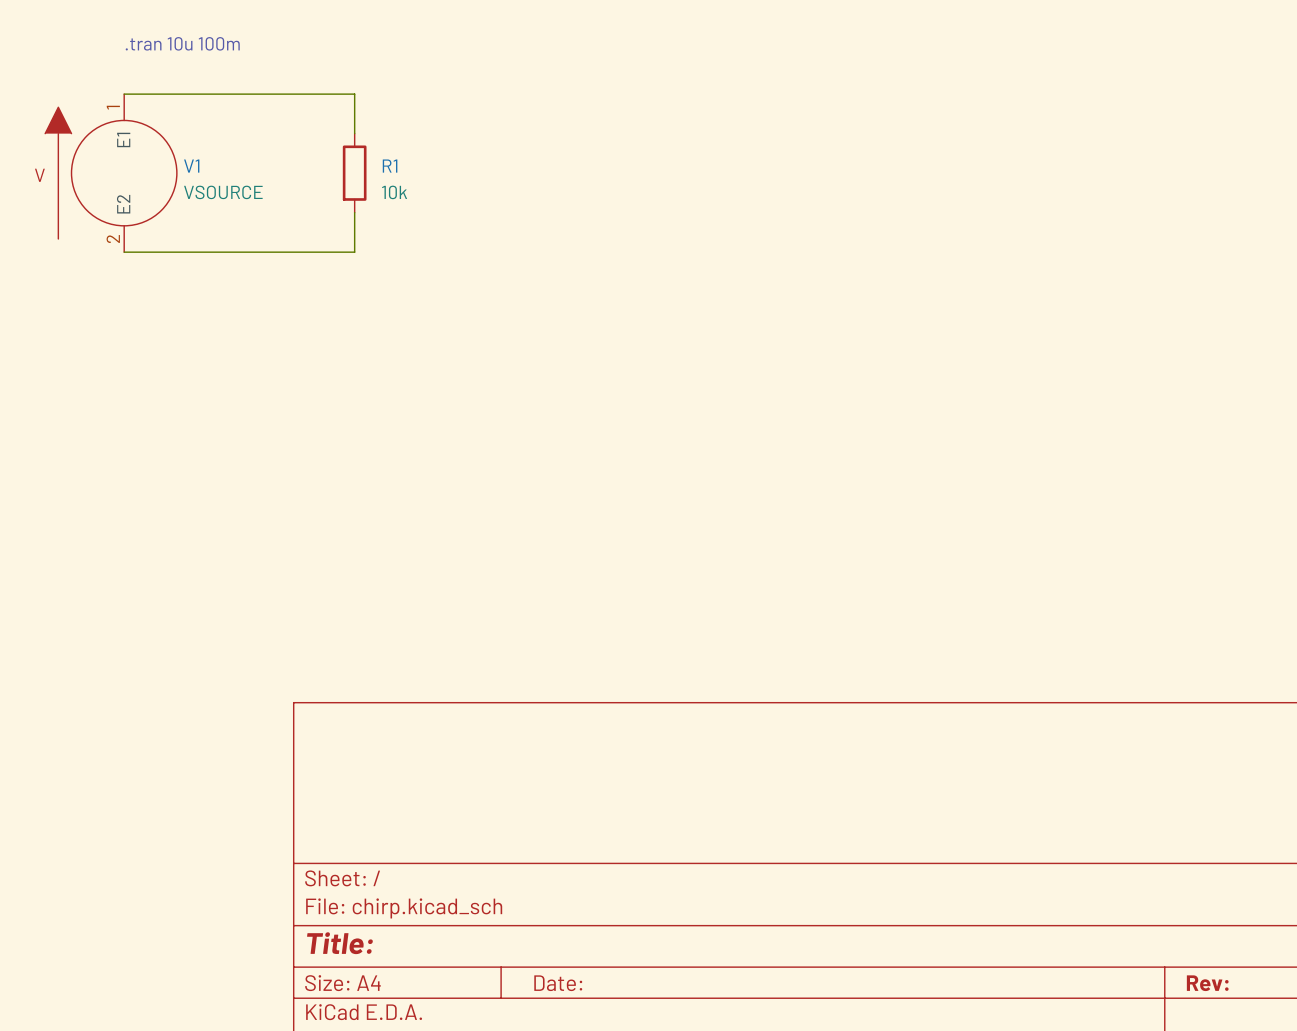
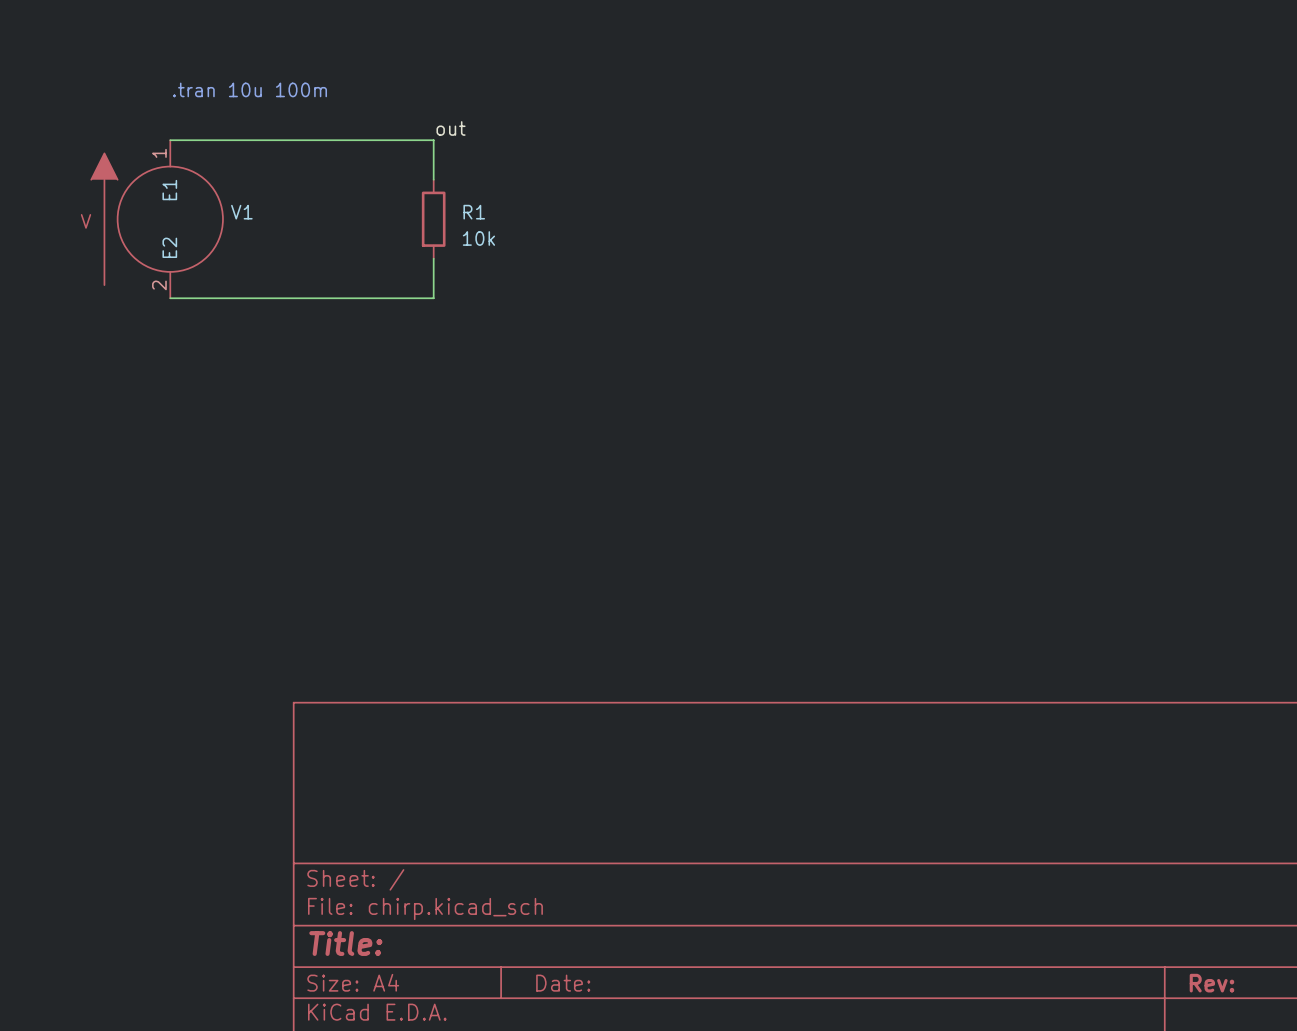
text position: .tran 10u 100m (182, 43) -> .tran 10u 100m (250, 89)
wire: (124, 94) (354, 94) (354, 133) -> none
label: none -> out (451, 128)
wire: none -> (170, 140) (433, 140) (433, 179)
V1 position: (111, 173) -> (157, 219)
R1 position: (354, 173) -> (433, 219)
V1 value: VSOURCE (223, 192) -> none
wire: (354, 212) (354, 252) (124, 252) -> none
wire: none -> (433, 258) (433, 298) (170, 298)

